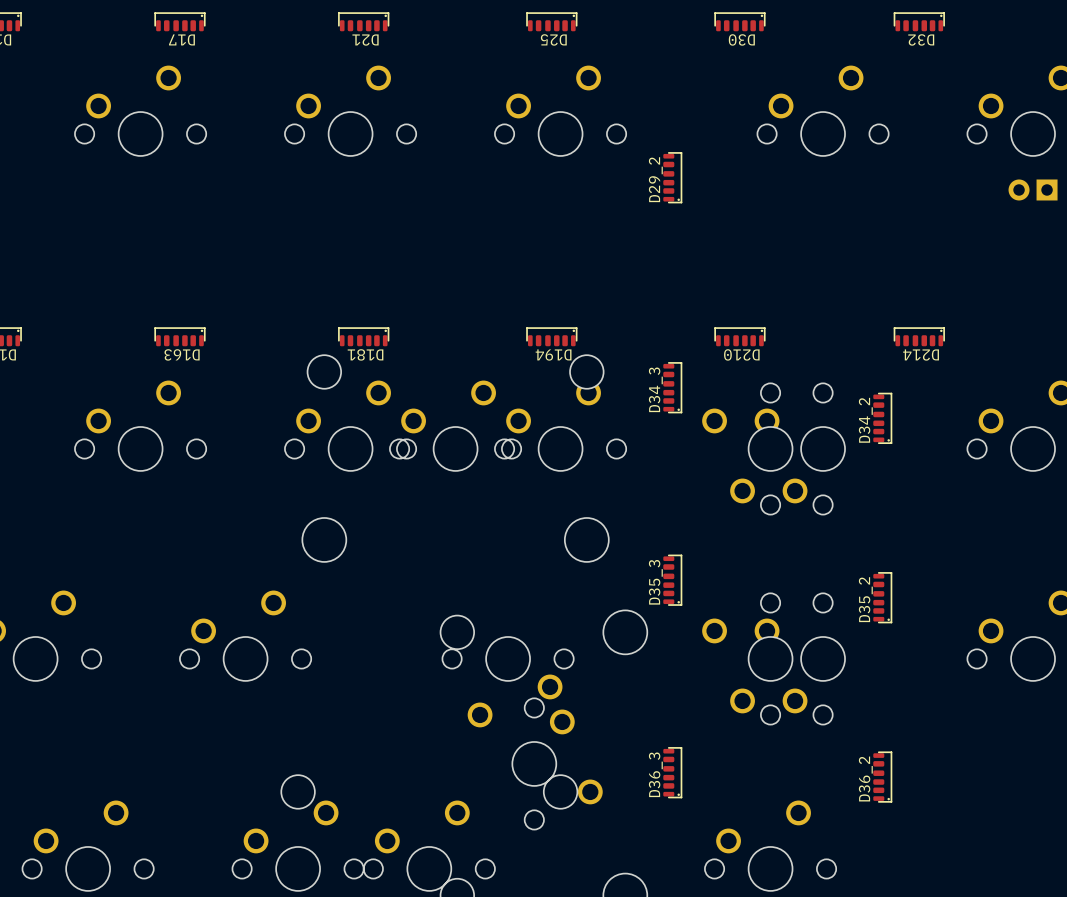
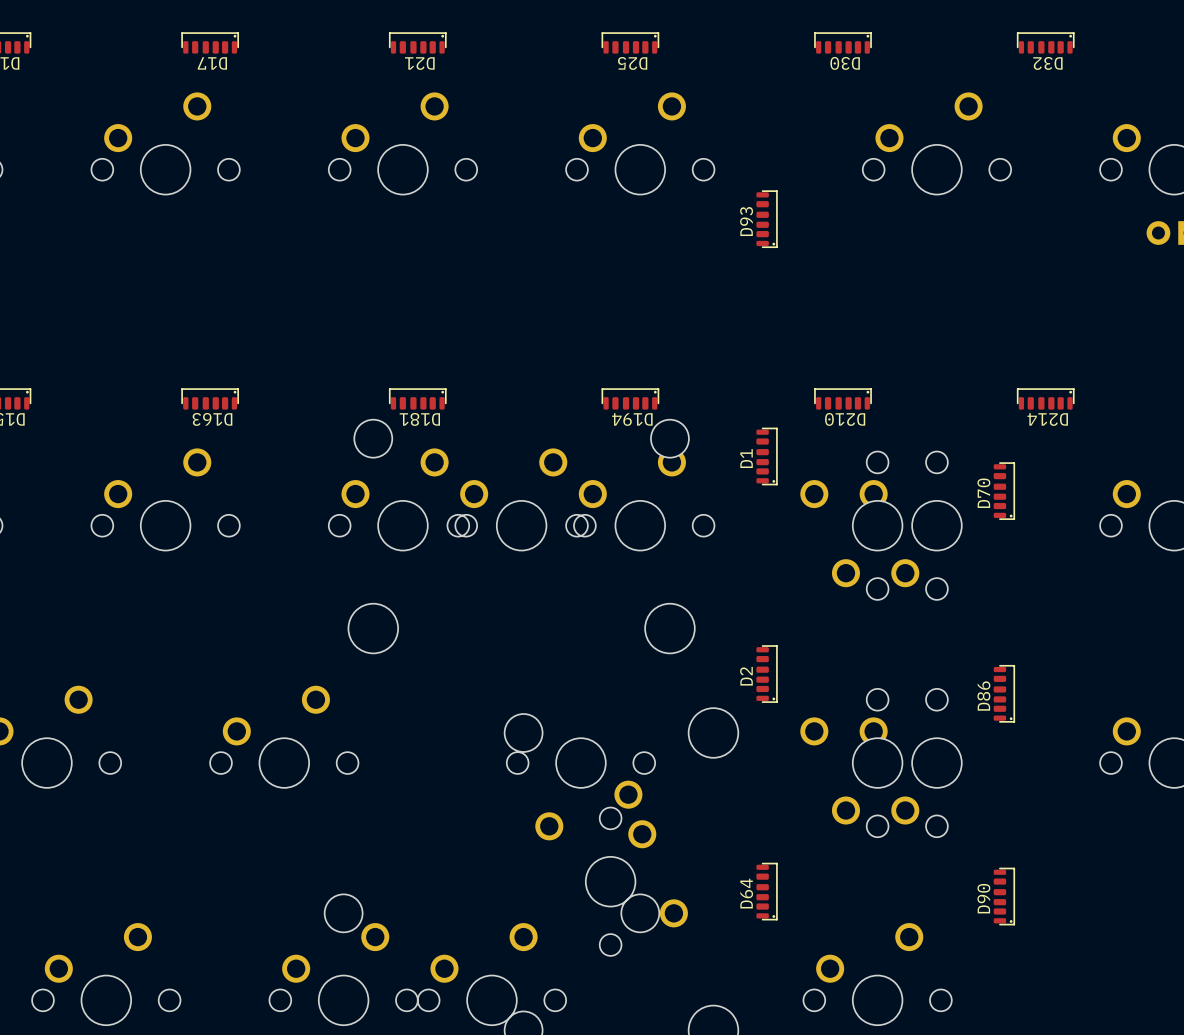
D29_2 name: D29_2 (655, 179) -> D93 (746, 221)
D34_3 name: D34_3 (655, 389) -> D1 (746, 458)
D34_2 name: D34_2 (865, 420) -> D70 (983, 493)
D35_3 name: D35_3 (655, 582) -> D2 (746, 676)
D35_2 name: D35_2 (865, 599) -> D86 (983, 696)
D36_3 name: D36_3 (655, 774) -> D64 (746, 893)
D36_2 name: D36_2 (865, 779) -> D90 (983, 898)

